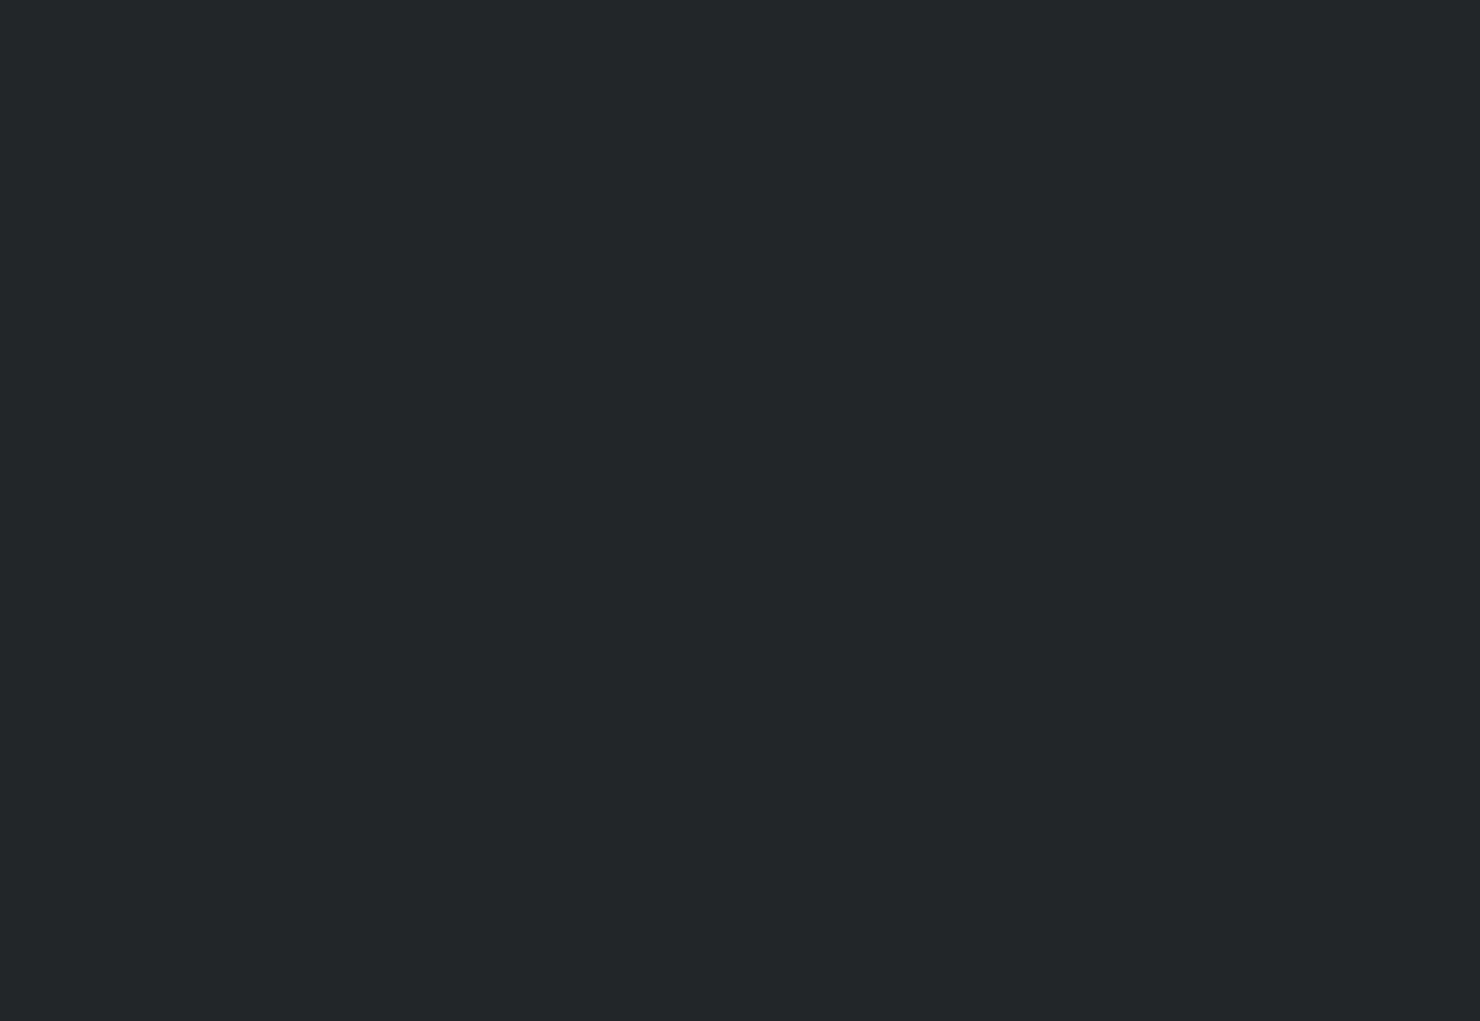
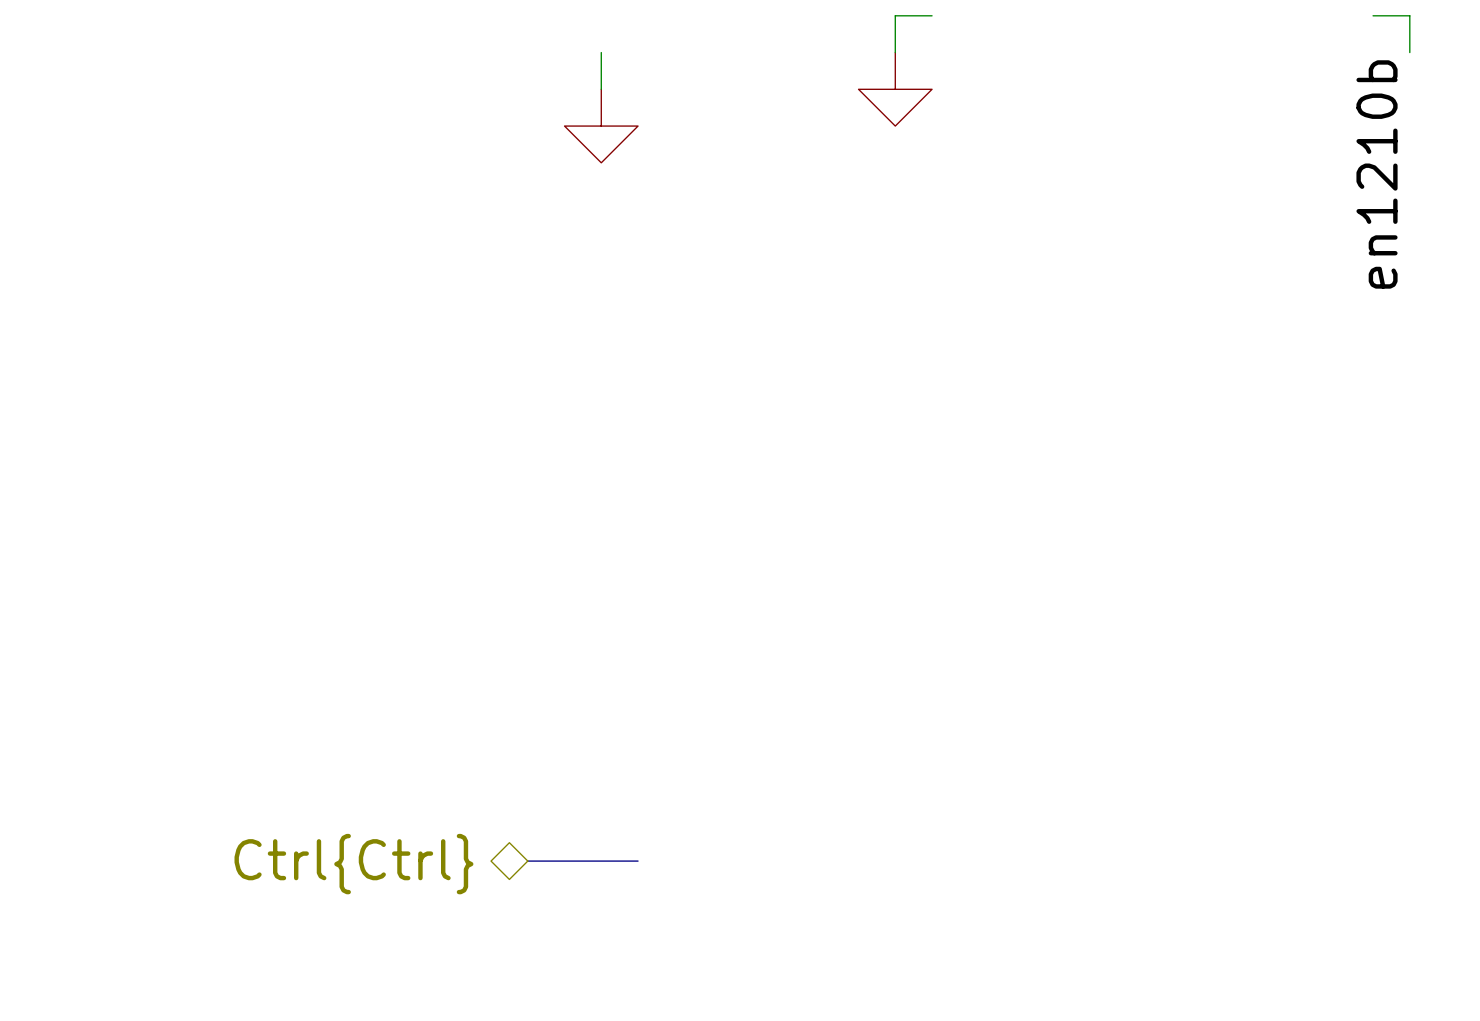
wire: none -> (932, 15) (895, 15) (895, 52)
wire: none -> (1373, 15) (1409, 15) (1409, 52)
wire: none -> (601, 52) (601, 89)
power symbol: none -> (895, 89)
power symbol: none -> (601, 126)
label: none -> en1210b (1377, 174)
bus: none -> (527, 861) (638, 861)
hierarchical label: none -> Ctrl{Ctrl} (353, 864)

